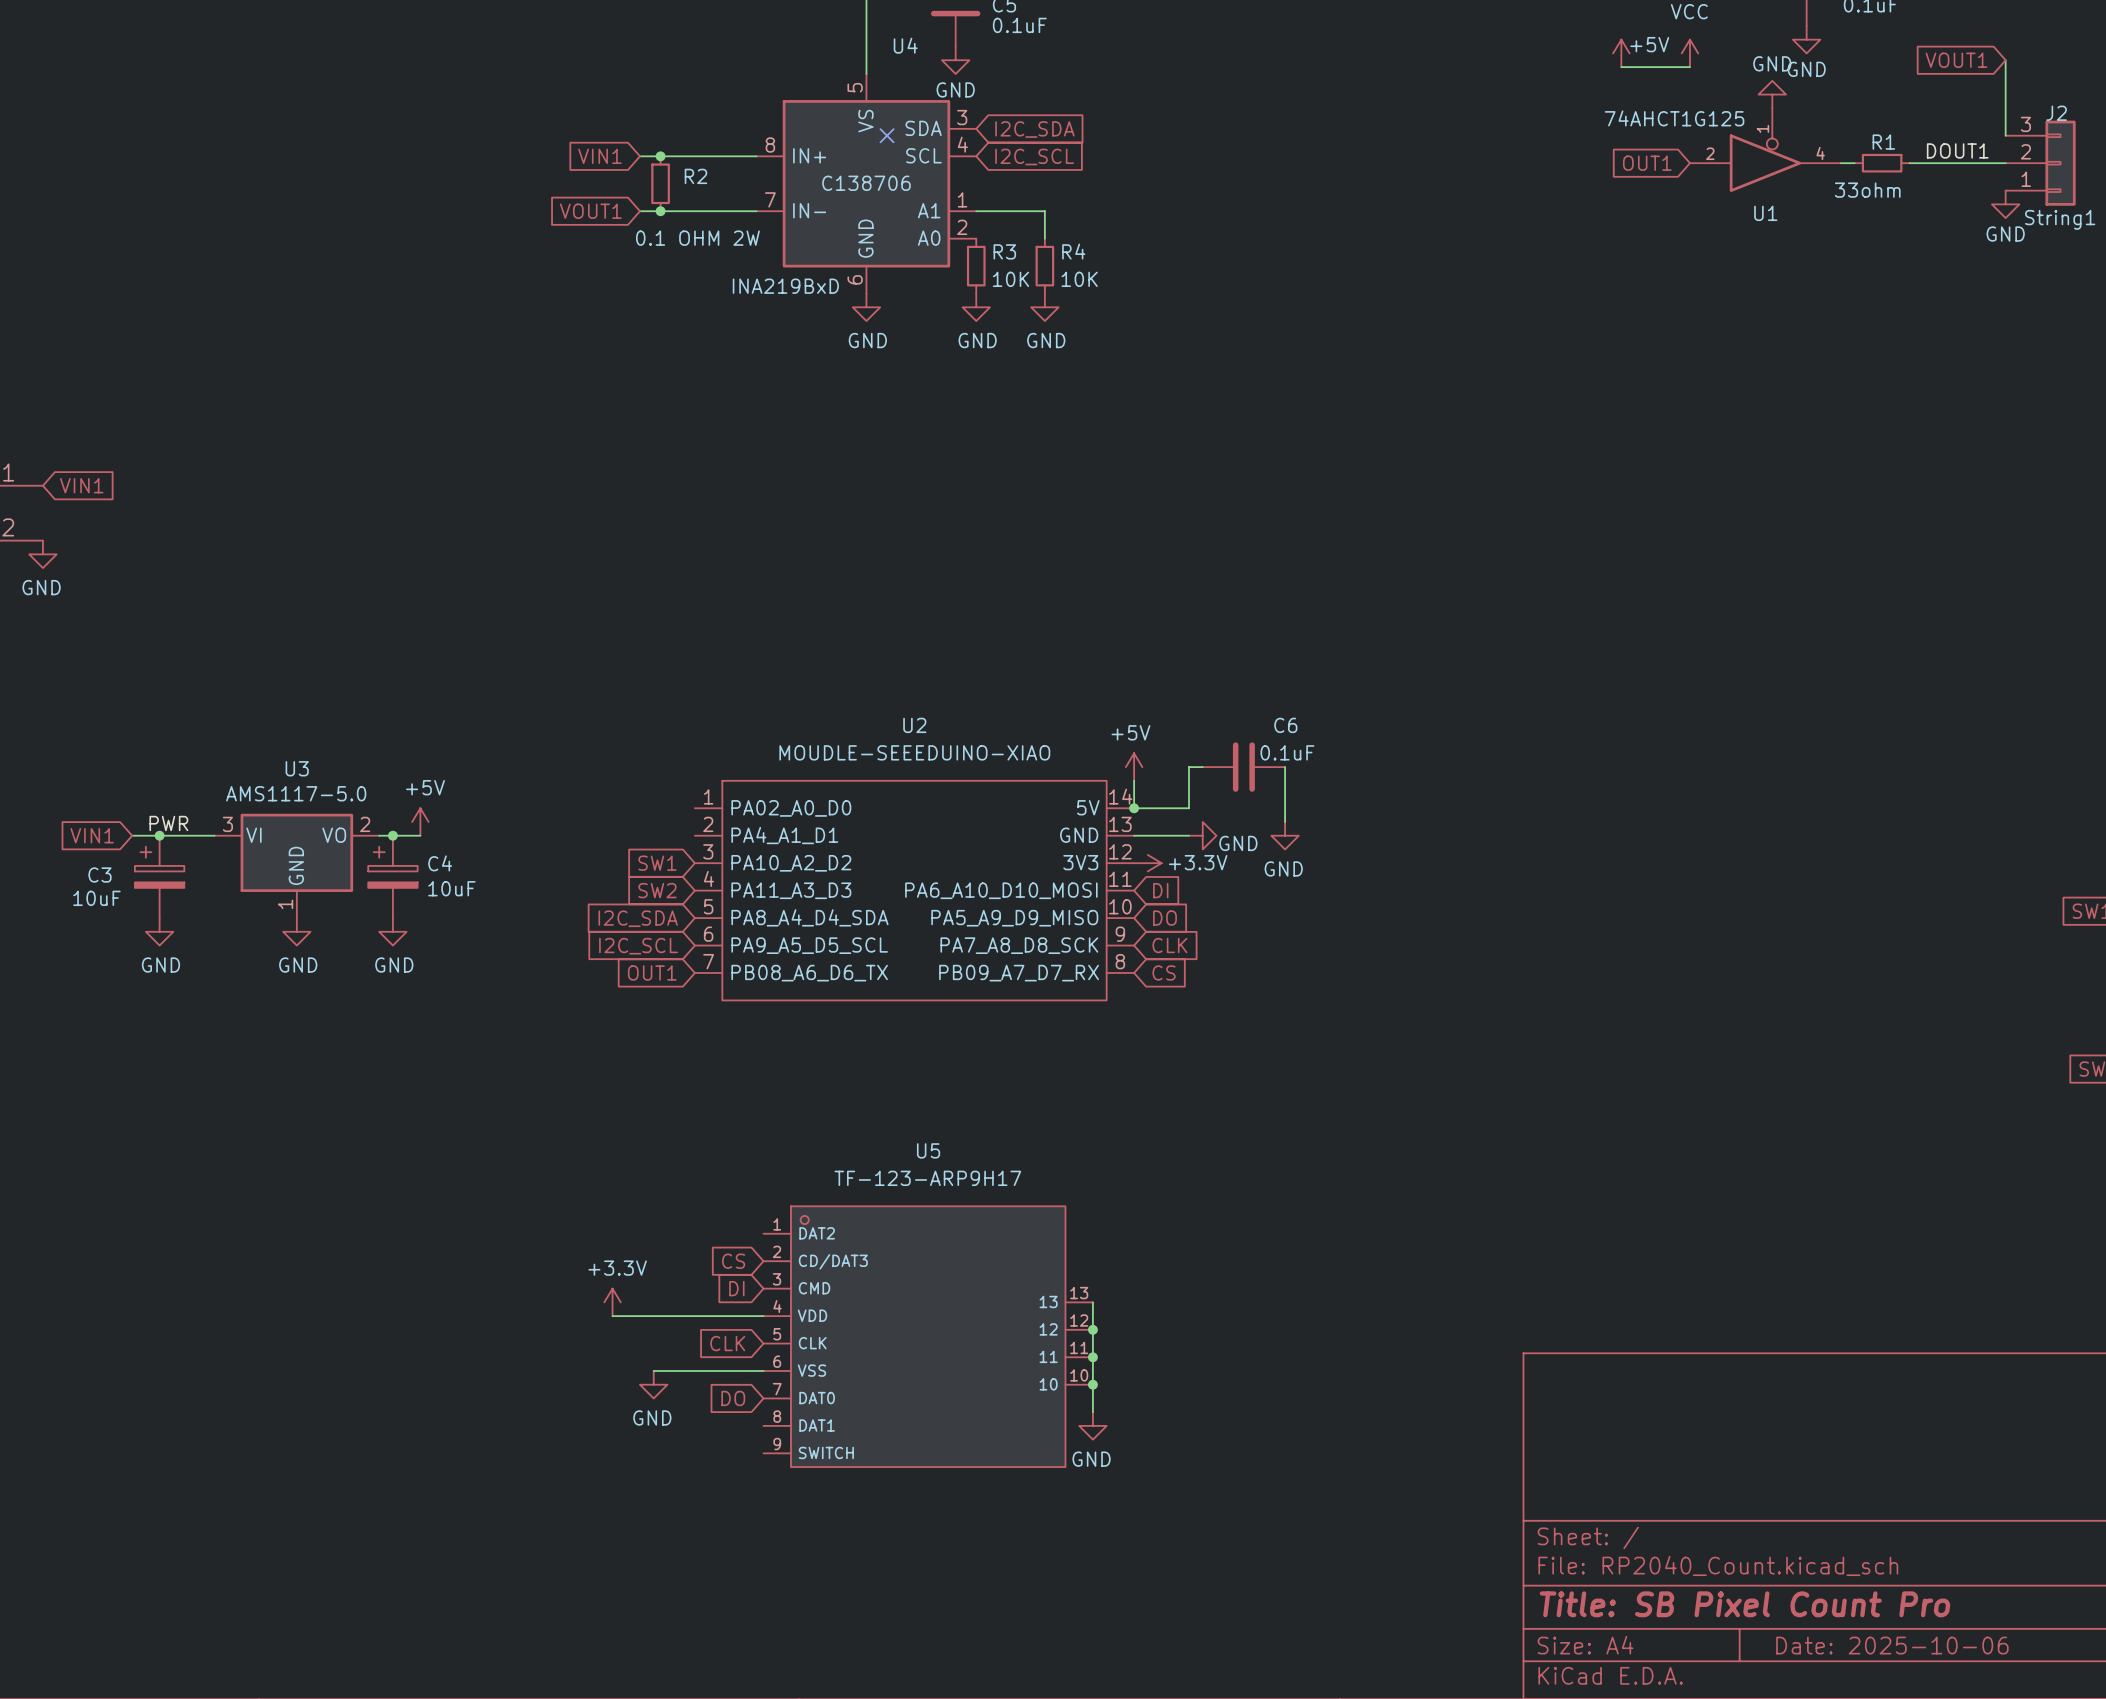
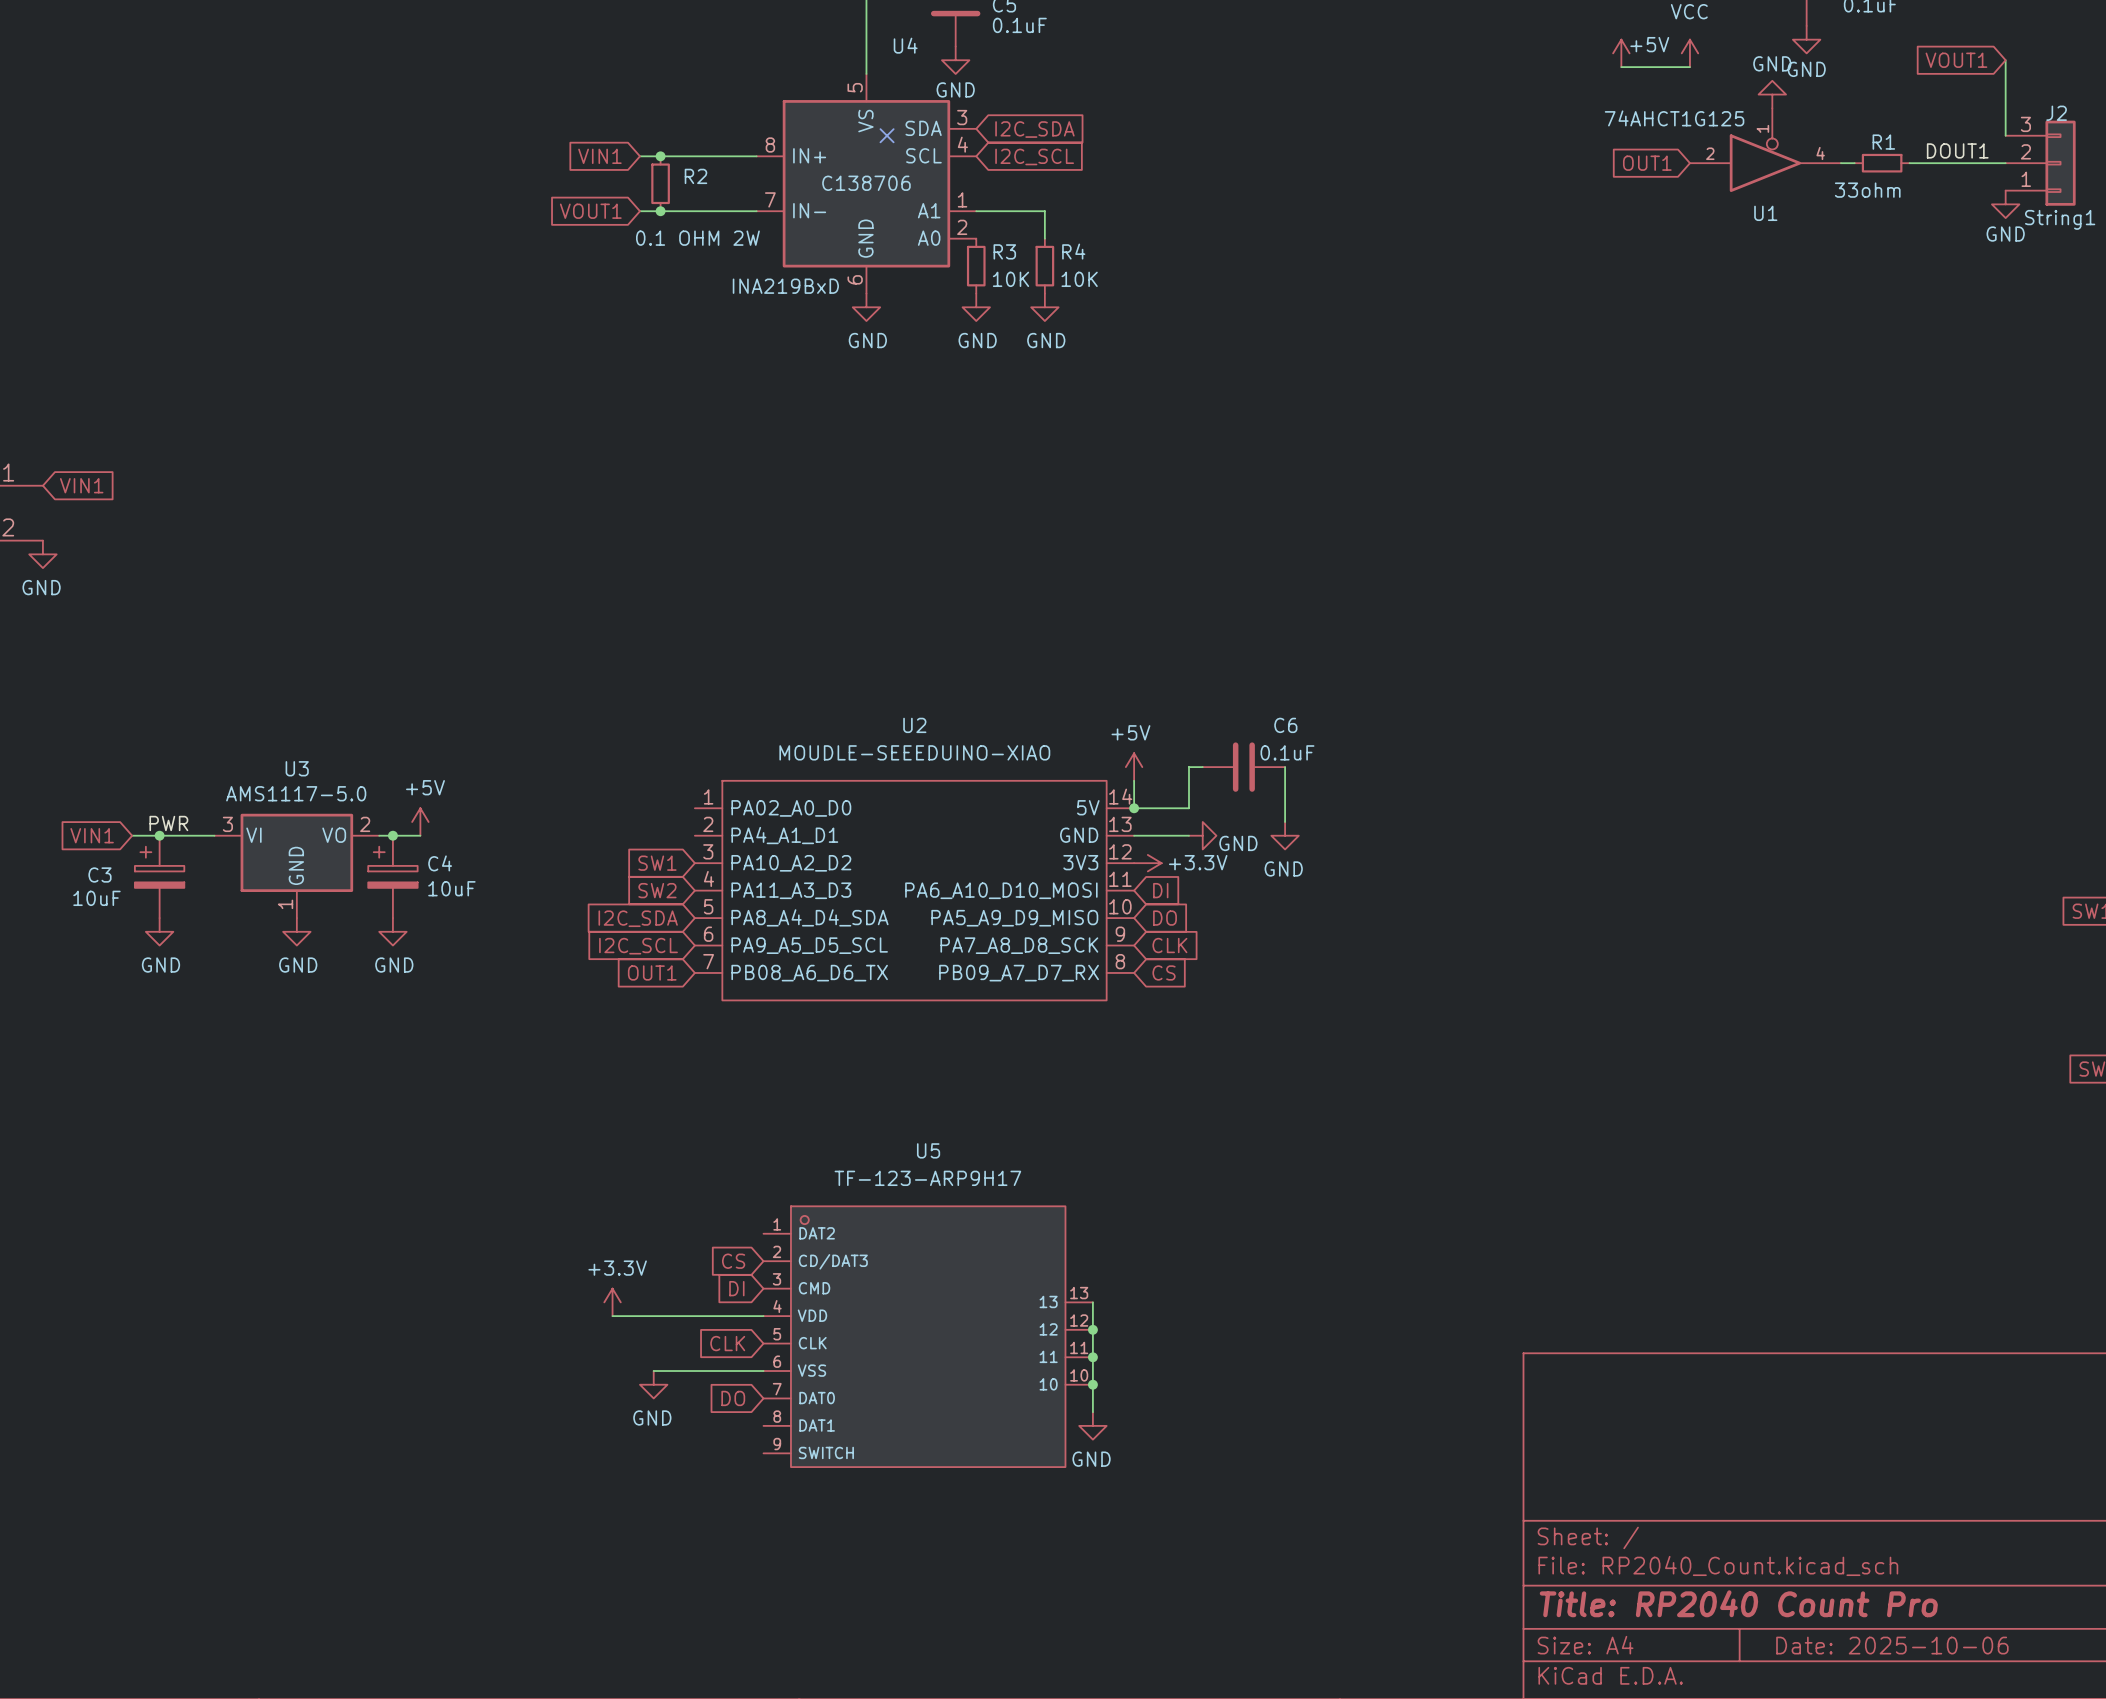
title block: Title: SB Pixel Count Pro (1744, 1604) -> Title: RP2040 Count Pro (1738, 1603)

